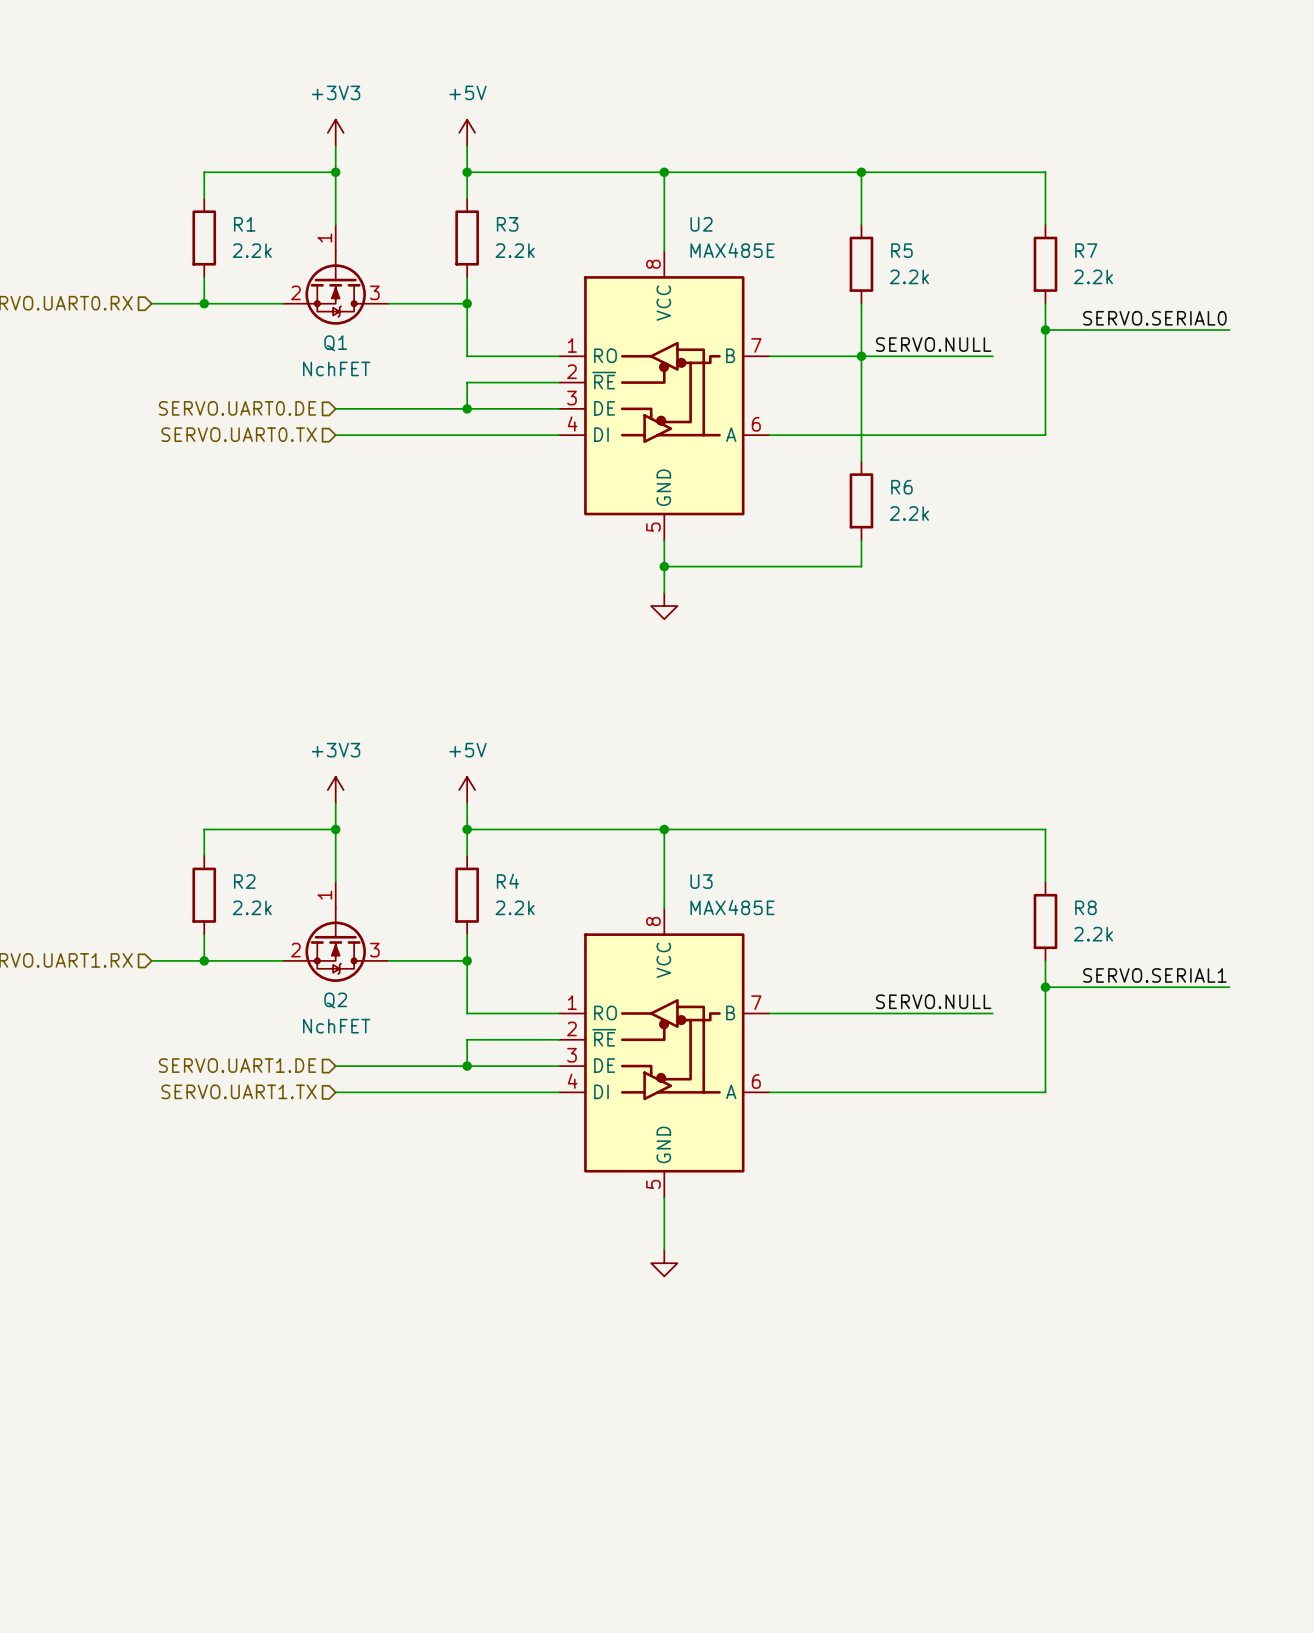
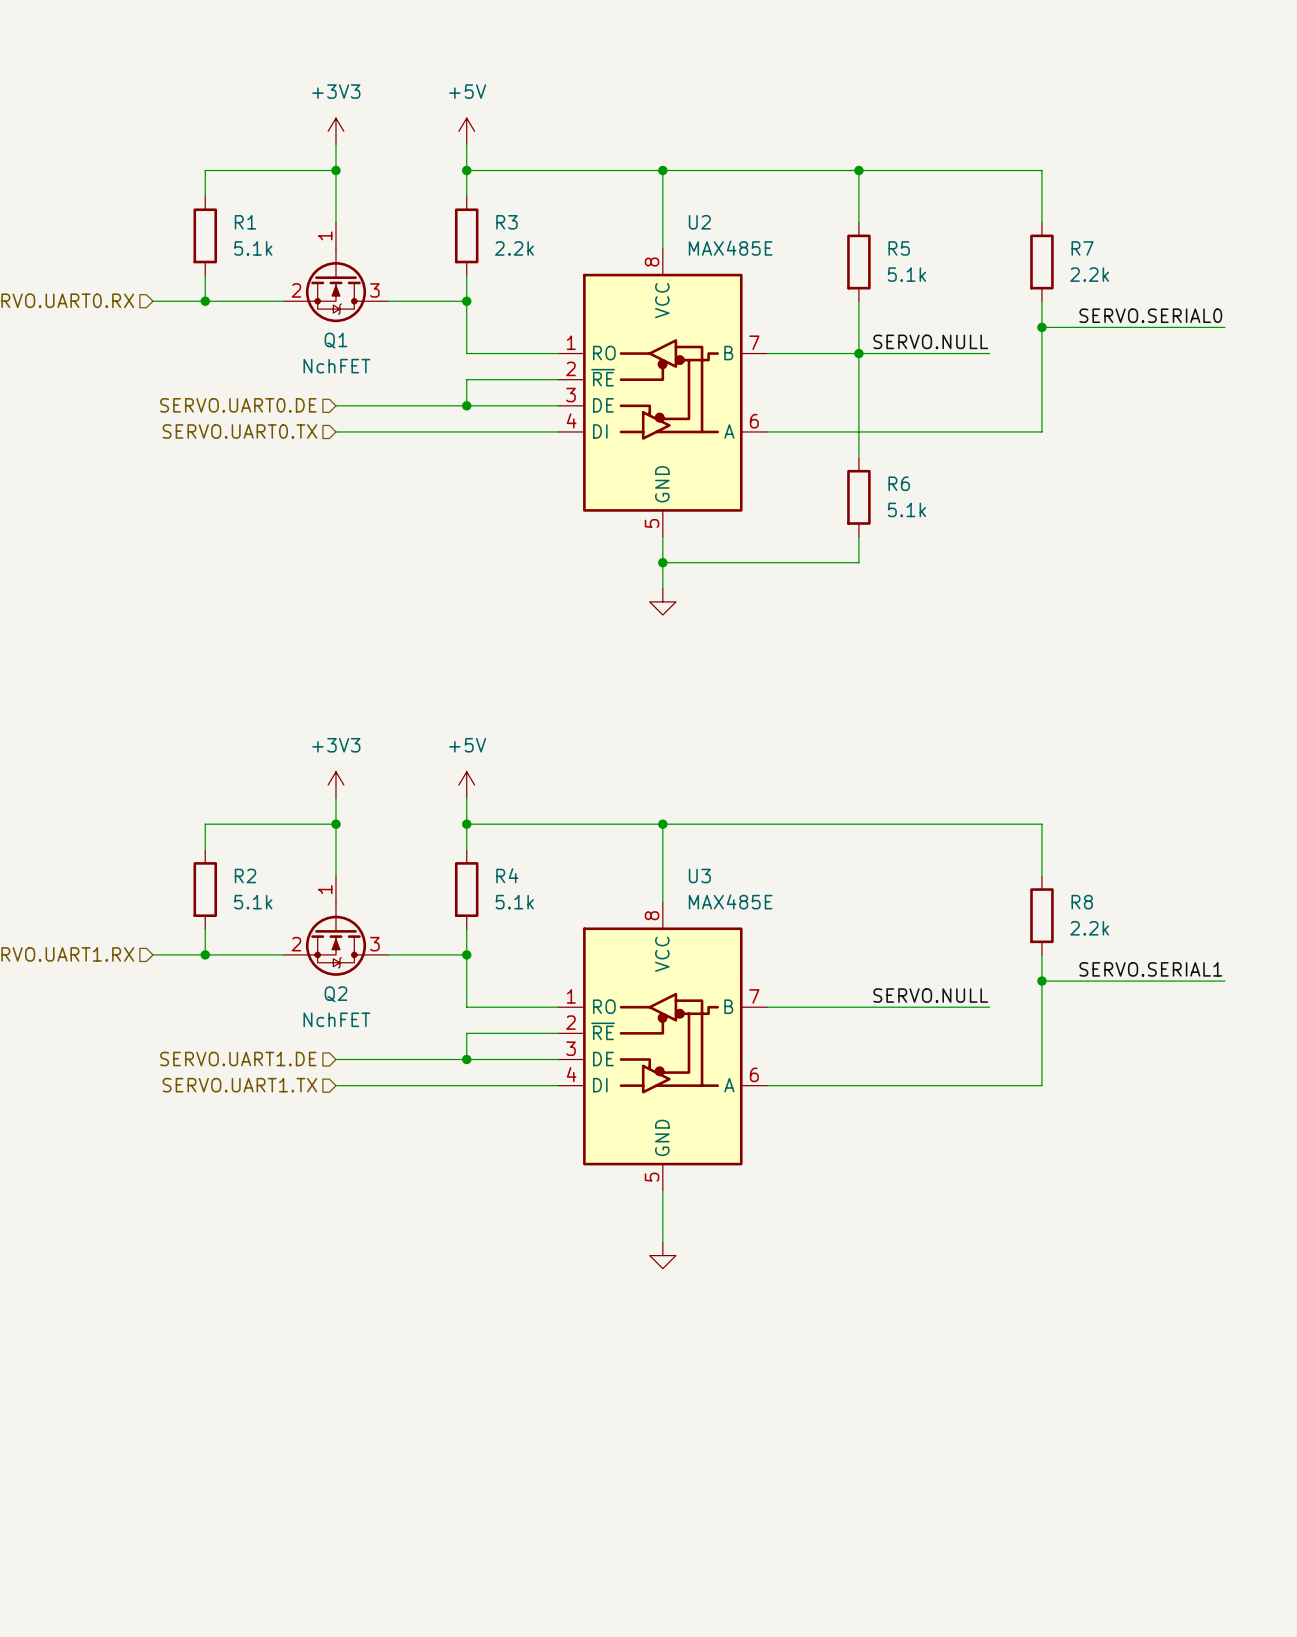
R1 value: 2.2k (252, 250) -> 5.1k (253, 248)
R5 value: 2.2k (909, 276) -> 5.1k (906, 274)
R6 value: 2.2k (909, 513) -> 5.1k (906, 509)
R2 value: 2.2k (252, 907) -> 5.1k (253, 902)
R4 value: 2.2k (515, 907) -> 5.1k (514, 902)

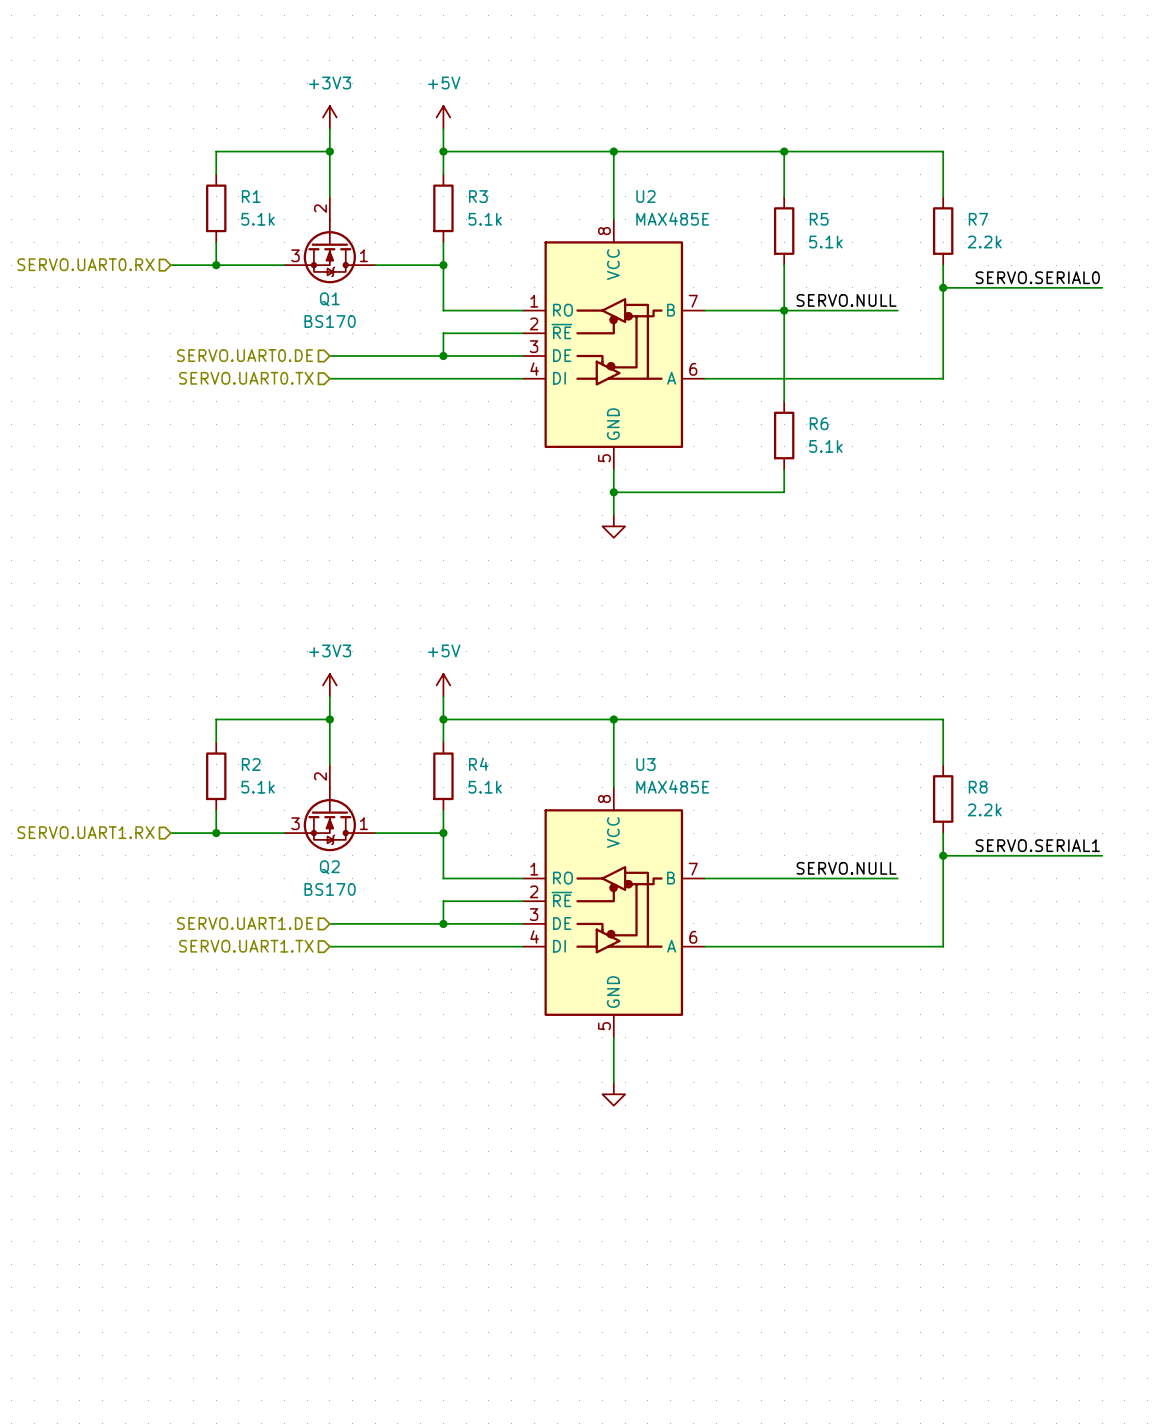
Q1 pin number: 1 (325, 235) -> 2 (320, 208)
R3 value: 2.2k (514, 248) -> 5.1k (485, 219)
Q1 pin number: 2 (296, 290) -> 3 (295, 255)
Q1 pin number: 3 (374, 290) -> 1 (363, 255)
Q1 value: NchFET (336, 366) -> BS170 (330, 321)
Q2 pin number: 1 (325, 889) -> 2 (320, 776)
Q2 pin number: 2 (296, 944) -> 3 (295, 823)
Q2 pin number: 3 (374, 944) -> 1 (363, 823)
Q2 value: NchFET (336, 1019) -> BS170 (330, 889)

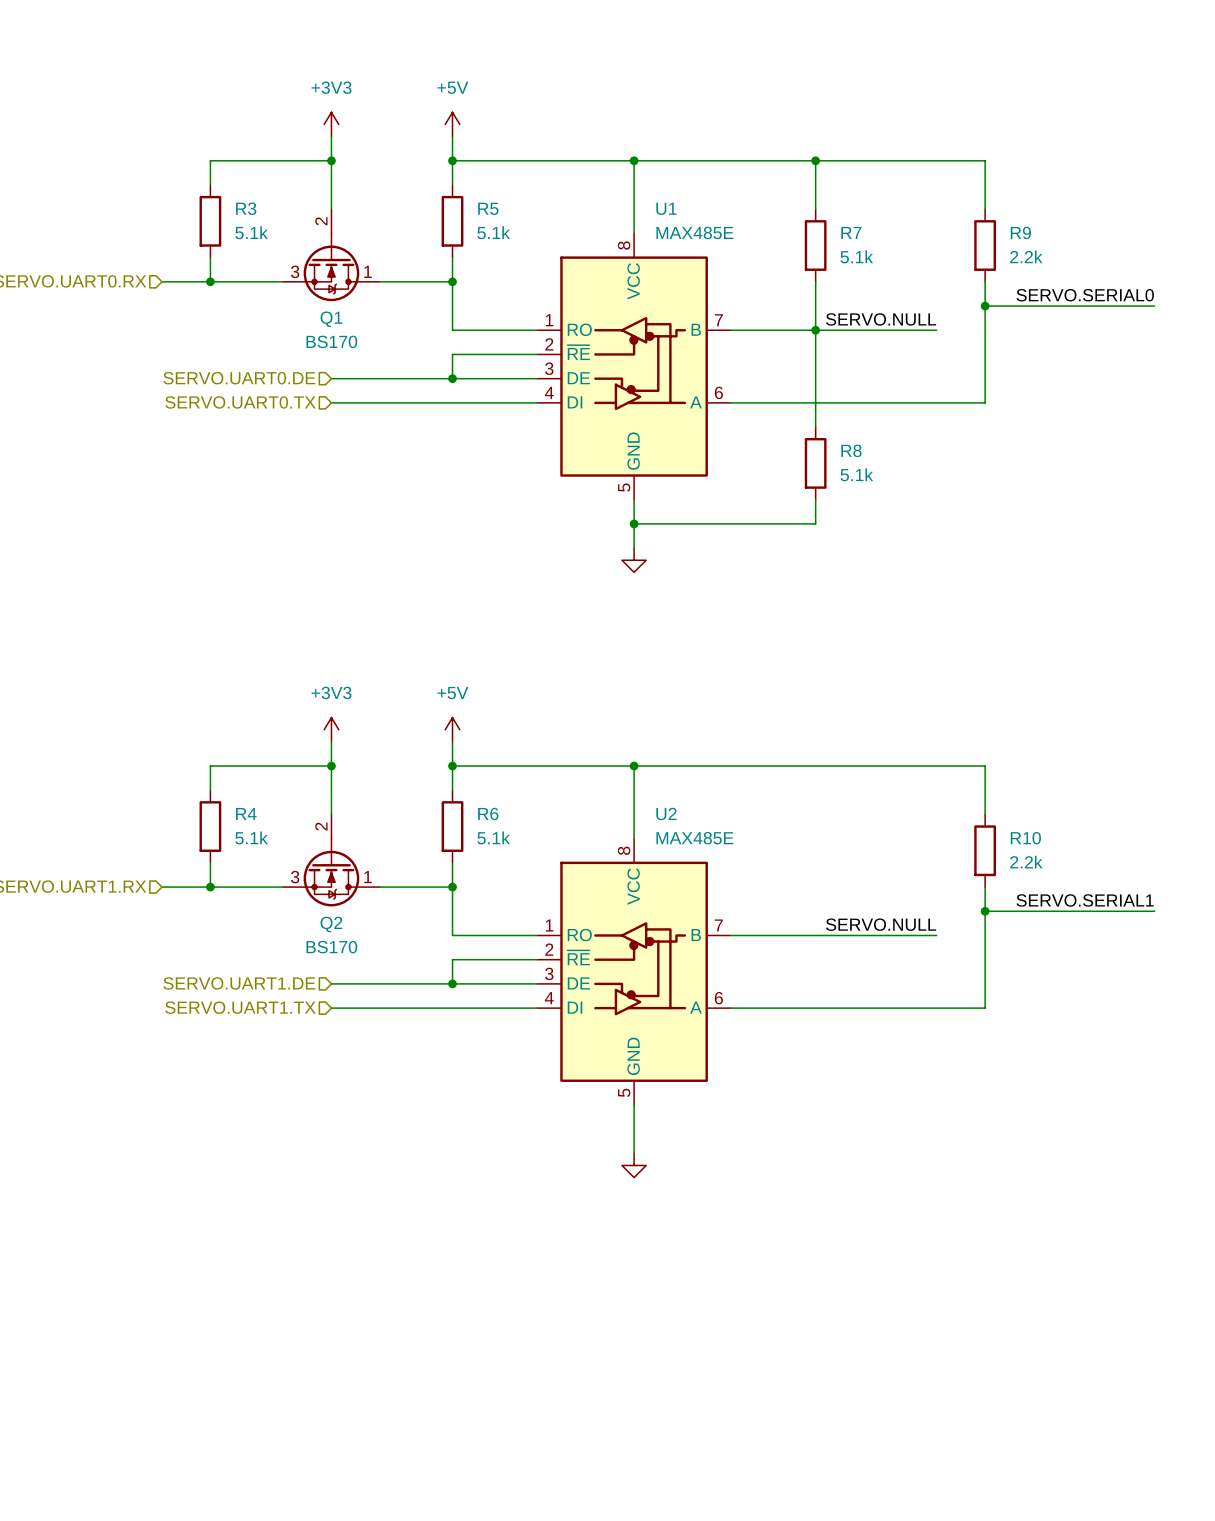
R1 name: R1 (251, 196) -> R3 (246, 208)
R3 name: R3 (478, 196) -> R5 (488, 208)
U2 name: U2 (645, 196) -> U1 (666, 208)
R5 name: R5 (819, 219) -> R7 (851, 232)
R7 name: R7 (978, 219) -> R9 (1020, 232)
R6 name: R6 (819, 423) -> R8 (851, 450)
R2 name: R2 (251, 764) -> R4 (246, 813)
R4 name: R4 (478, 764) -> R6 (488, 813)
U3 name: U3 (645, 764) -> U2 (666, 813)
R8 name: R8 (978, 787) -> R10 (1025, 838)

